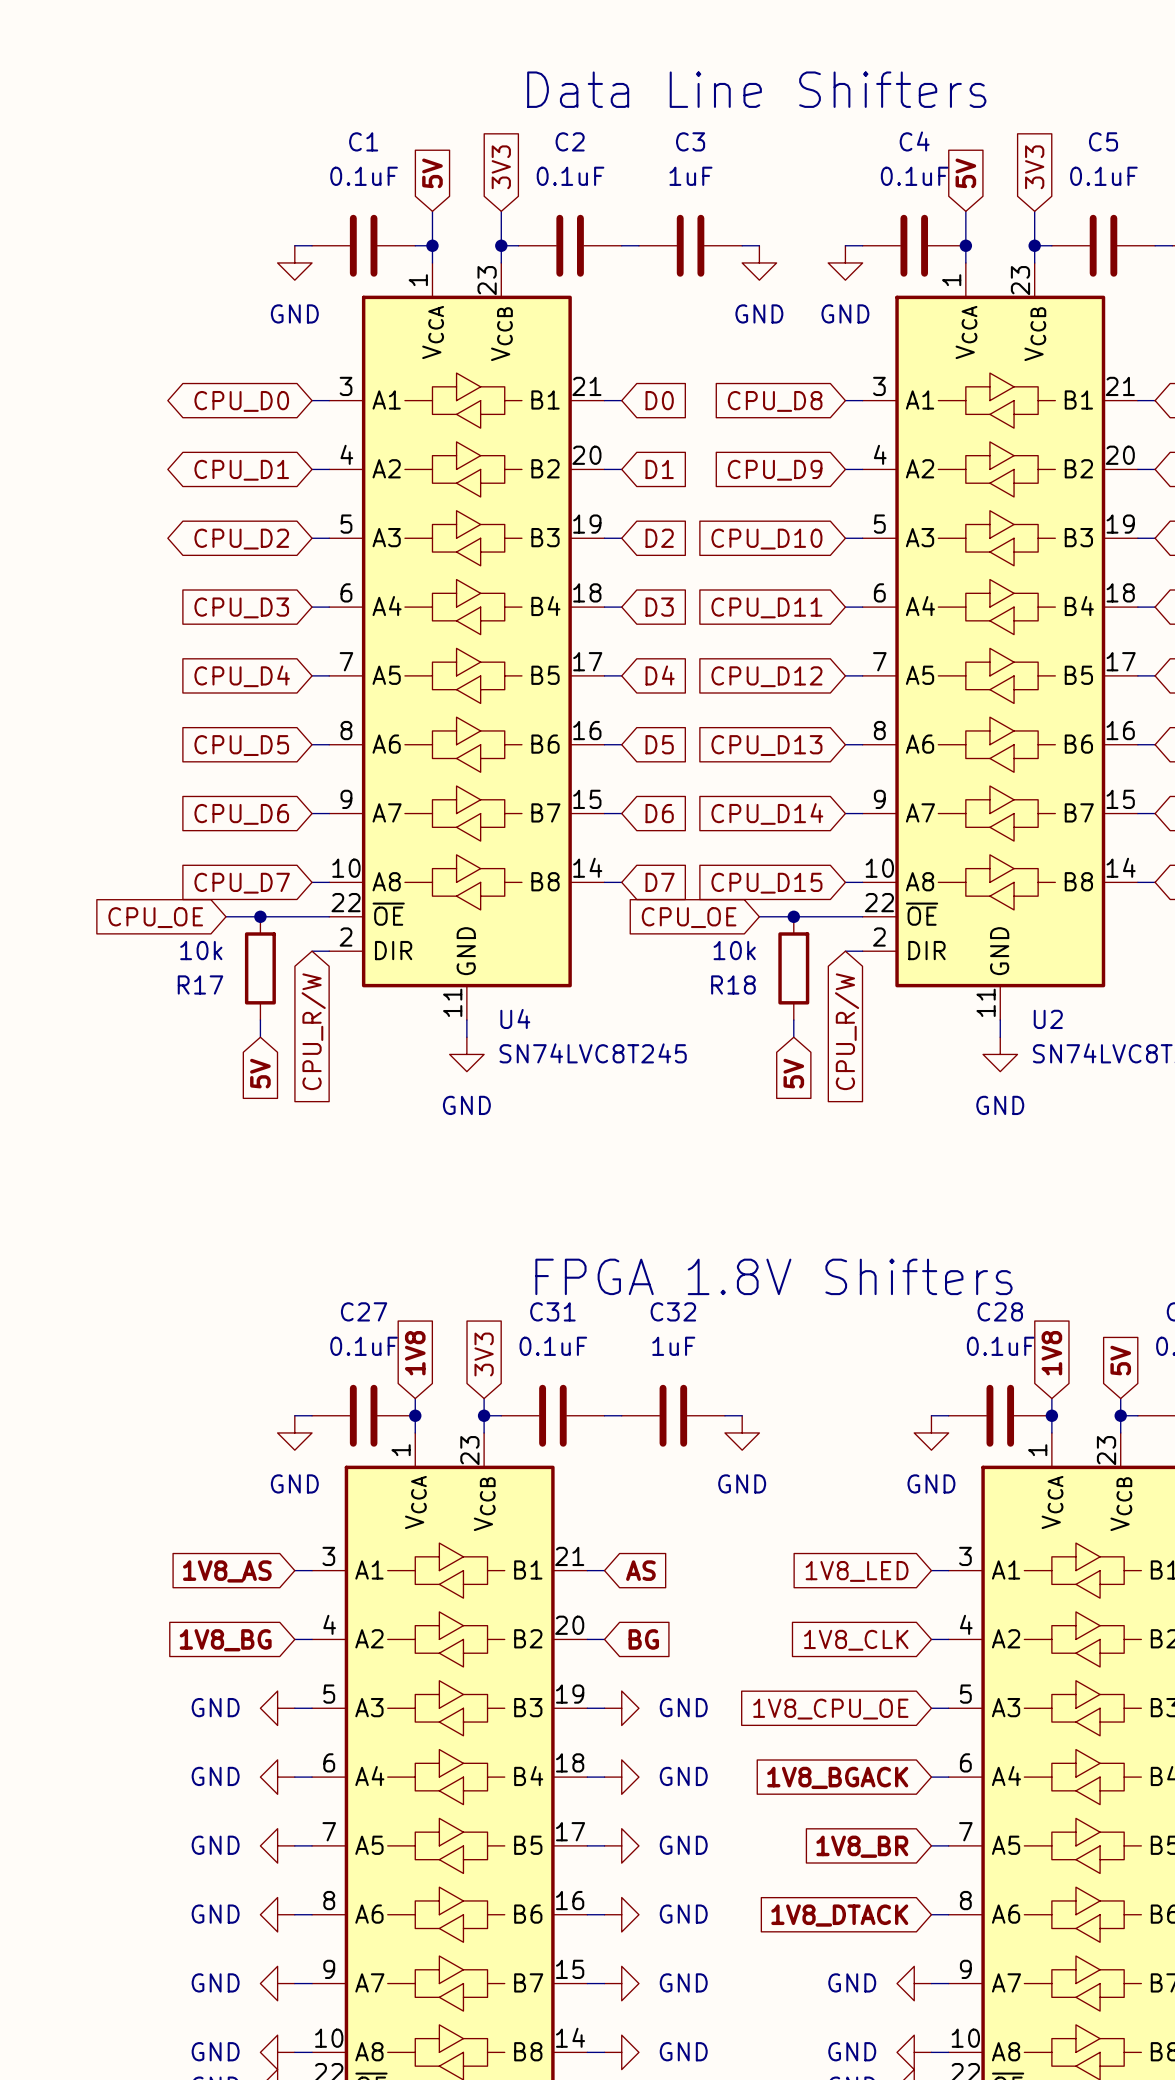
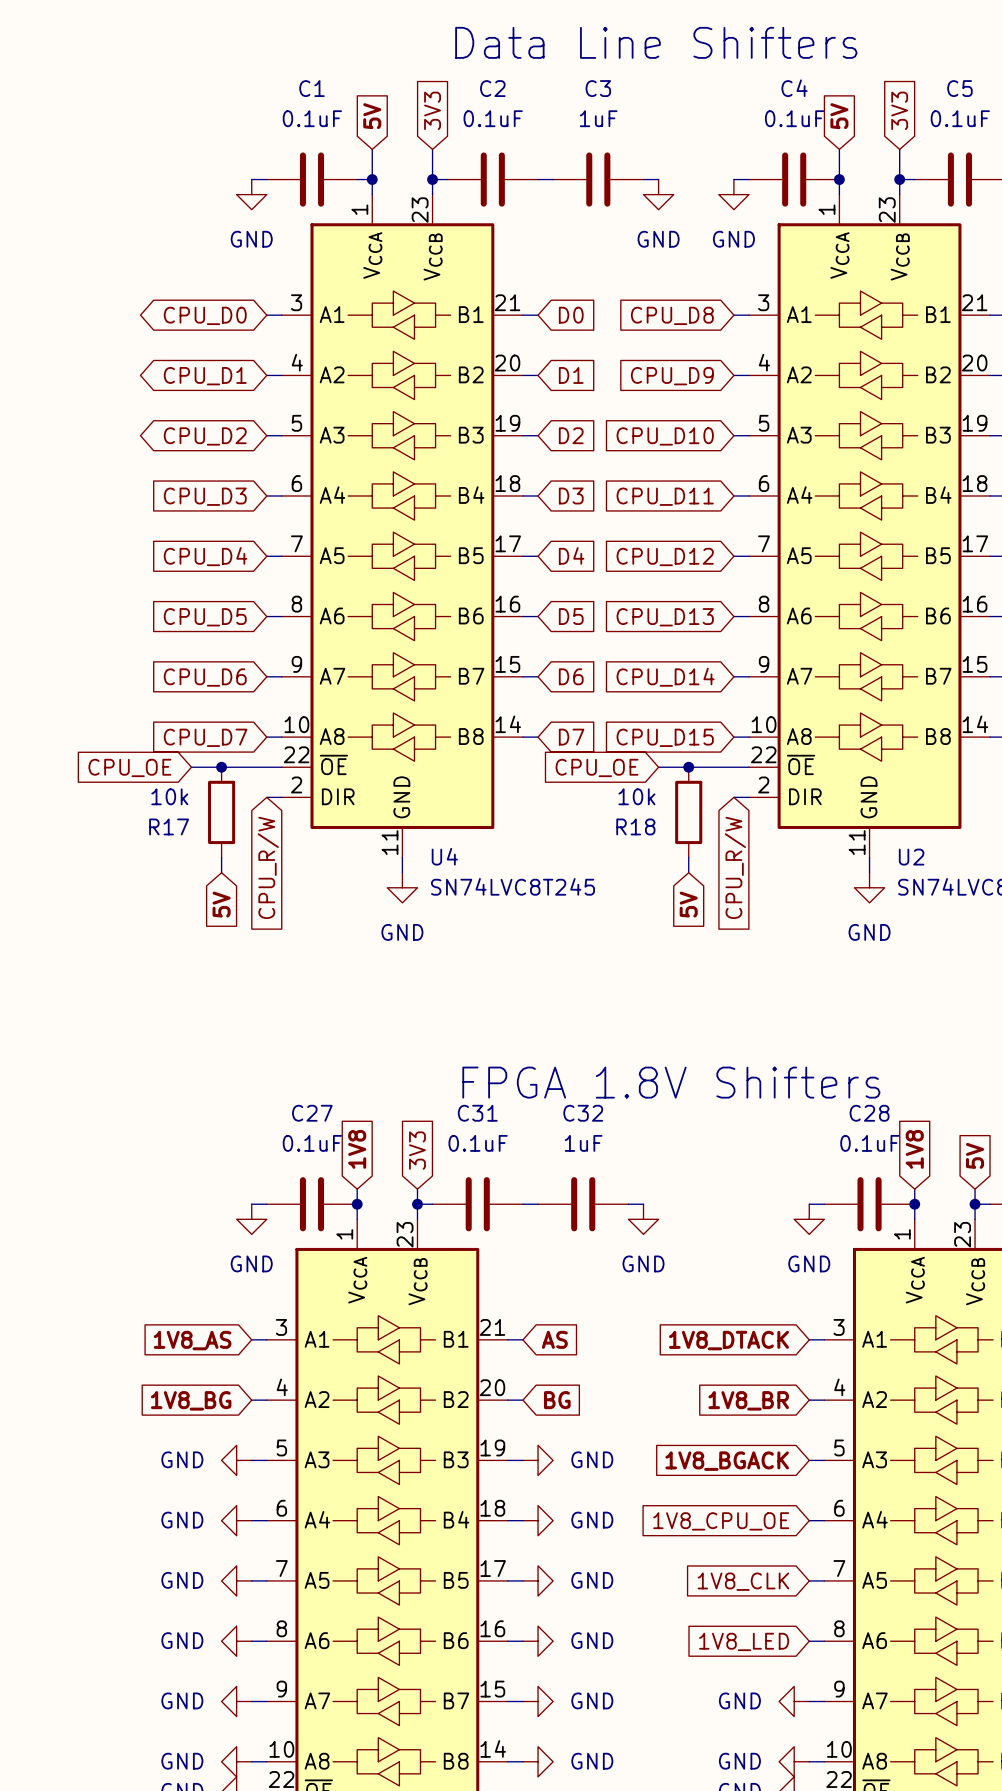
global label: 1V8_LED (857, 1571) -> 1V8_DTACK (728, 1340)
global label: 1V8_CLK (856, 1640) -> 1V8_BR (748, 1400)
global label: 1V8_CPU_OE (830, 1709) -> 1V8_BGACK (727, 1461)
global label: 1V8_BGACK (837, 1777) -> 1V8_CPU_OE (721, 1521)
global label: 1V8_BR (862, 1846) -> 1V8_CLK (743, 1581)
global label: 1V8_DTACK (839, 1915) -> 1V8_LED (744, 1641)

